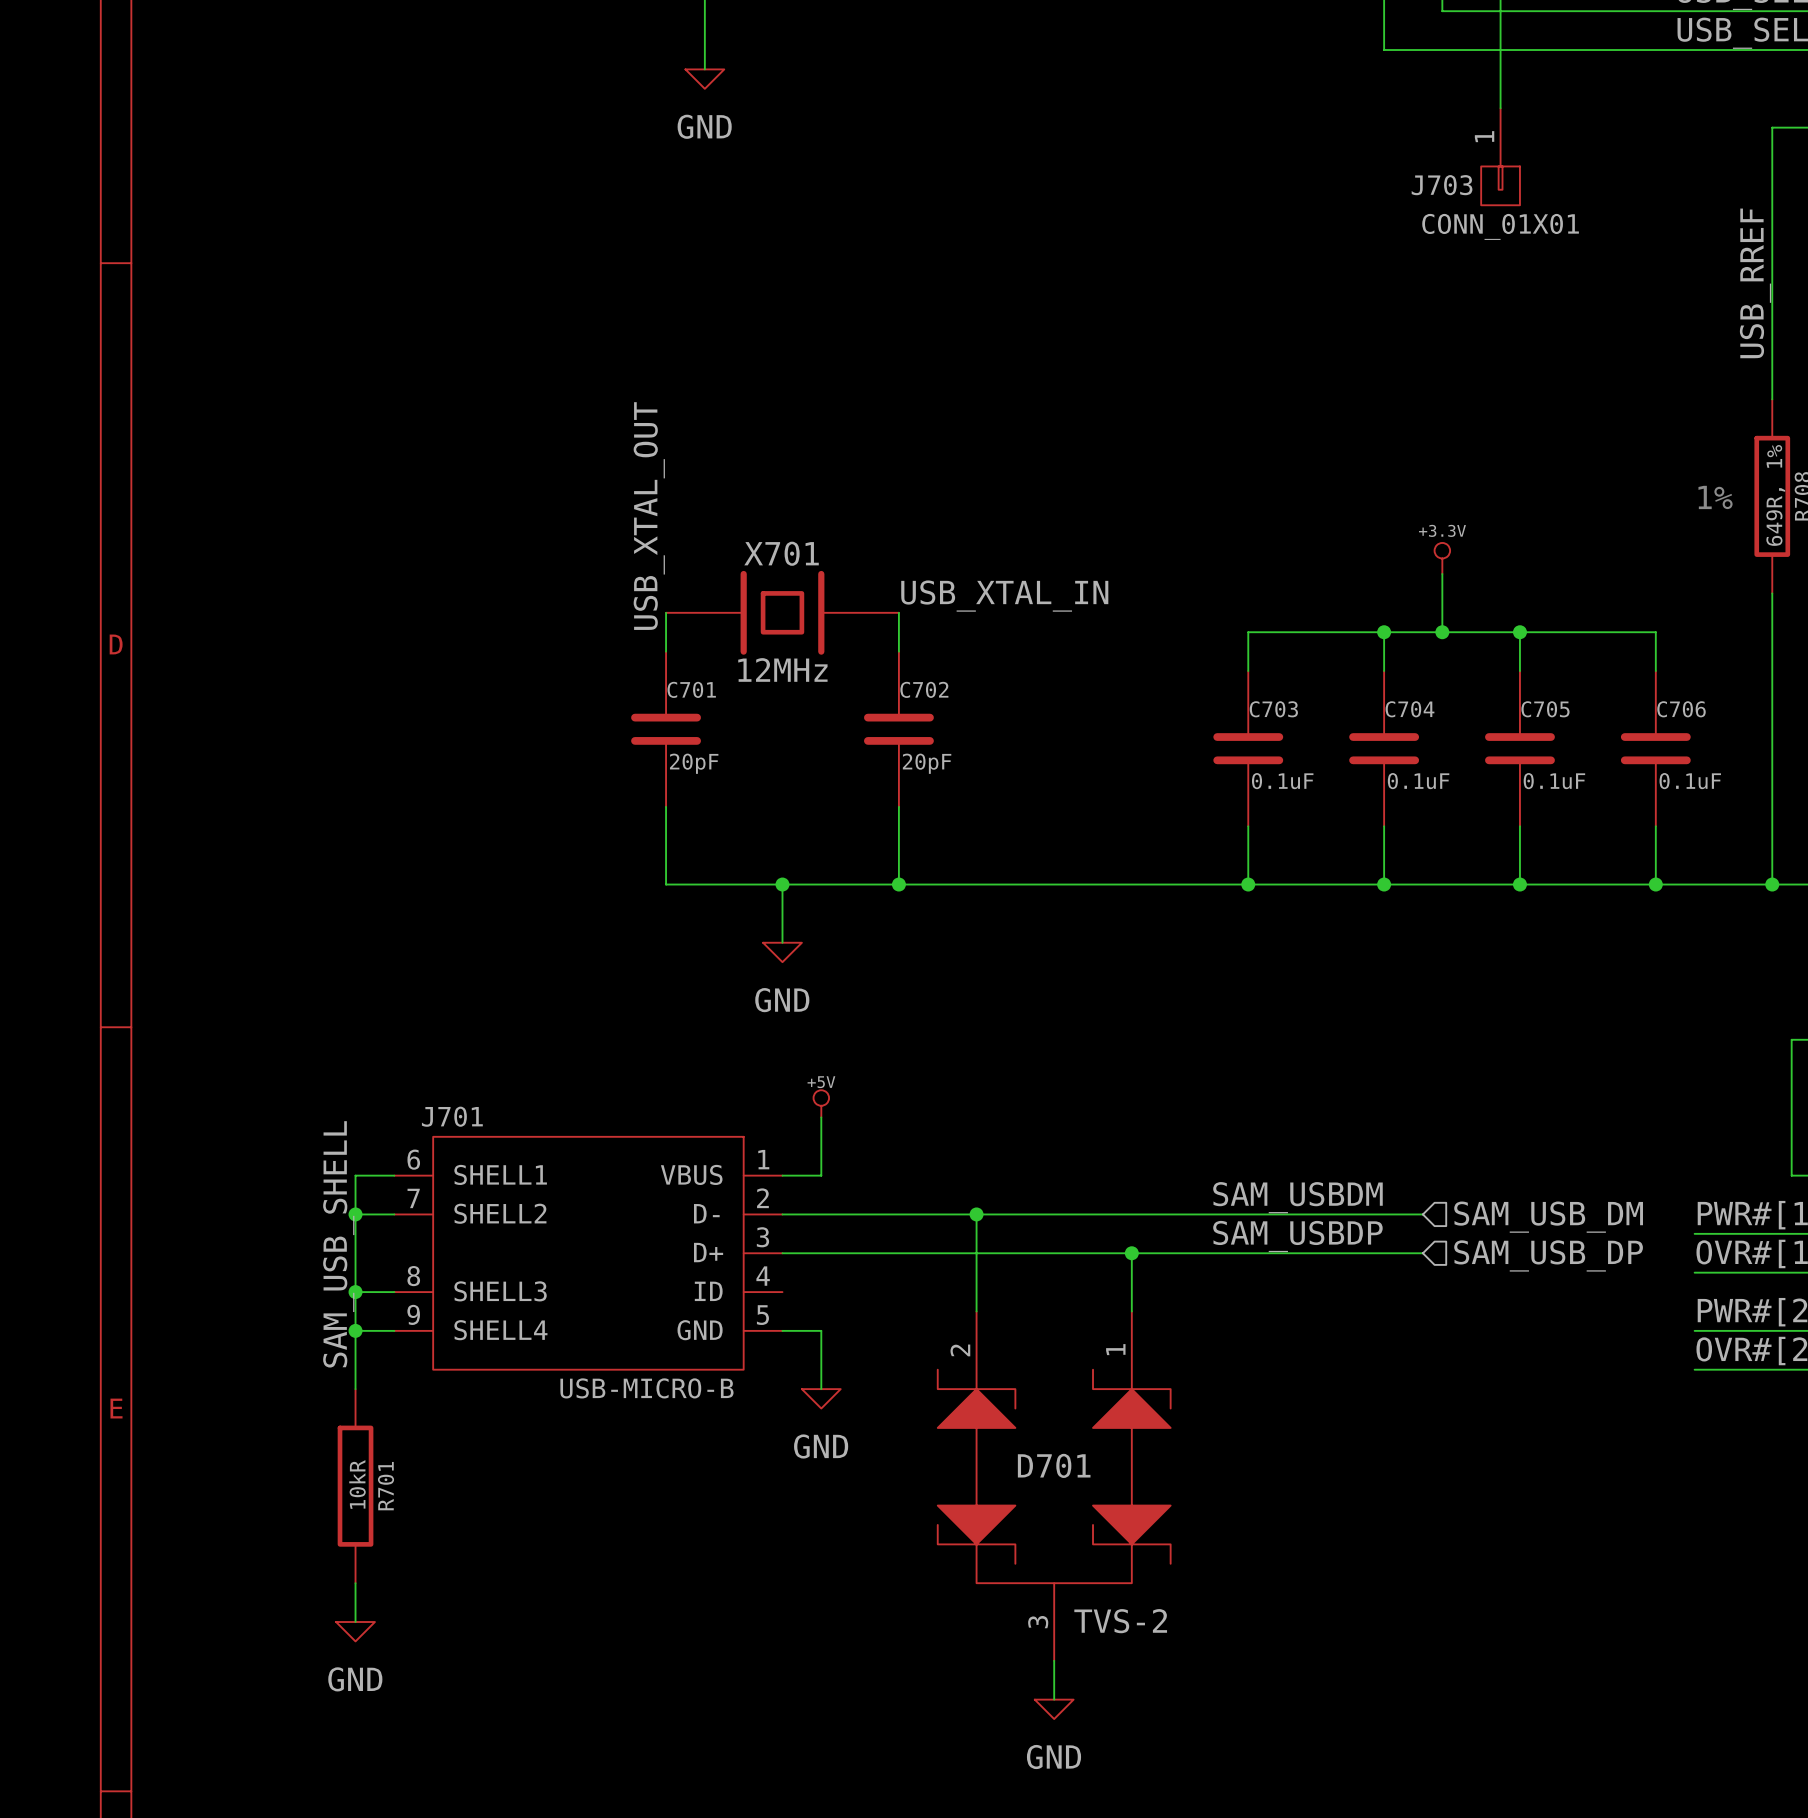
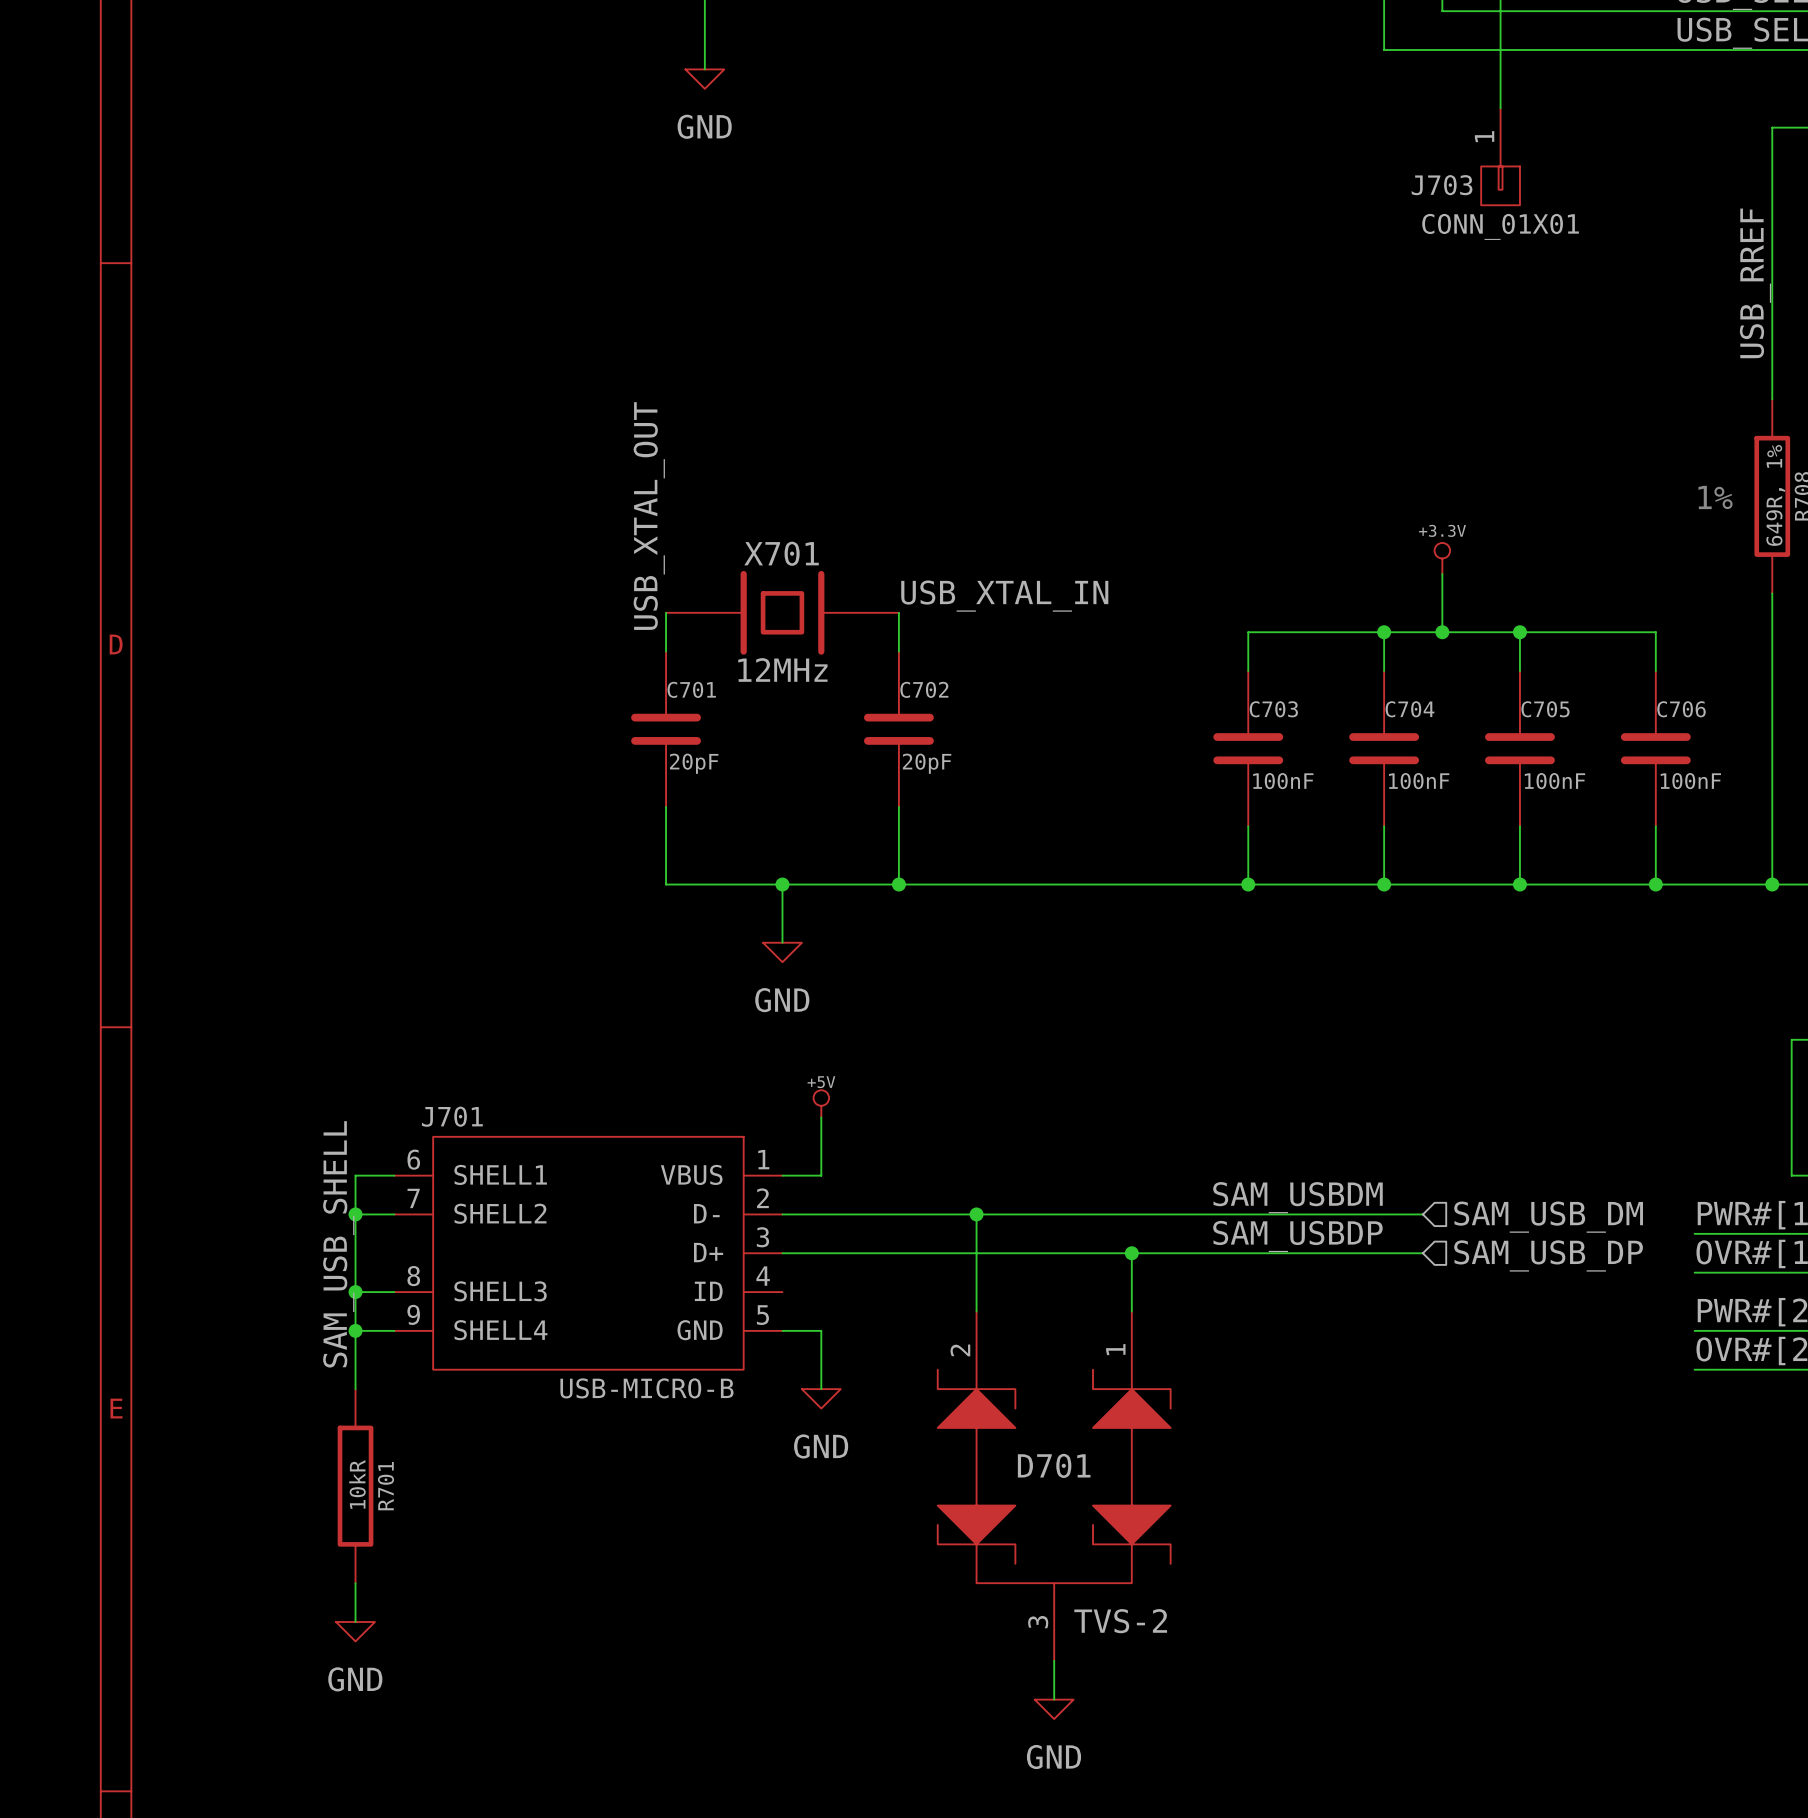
C703 value: 0.1uF (1282, 781) -> 100nF (1283, 781)
C704 value: 0.1uF (1418, 781) -> 100nF (1419, 781)
C705 value: 0.1uF (1554, 781) -> 100nF (1555, 781)
C706 value: 0.1uF (1690, 781) -> 100nF (1690, 781)

